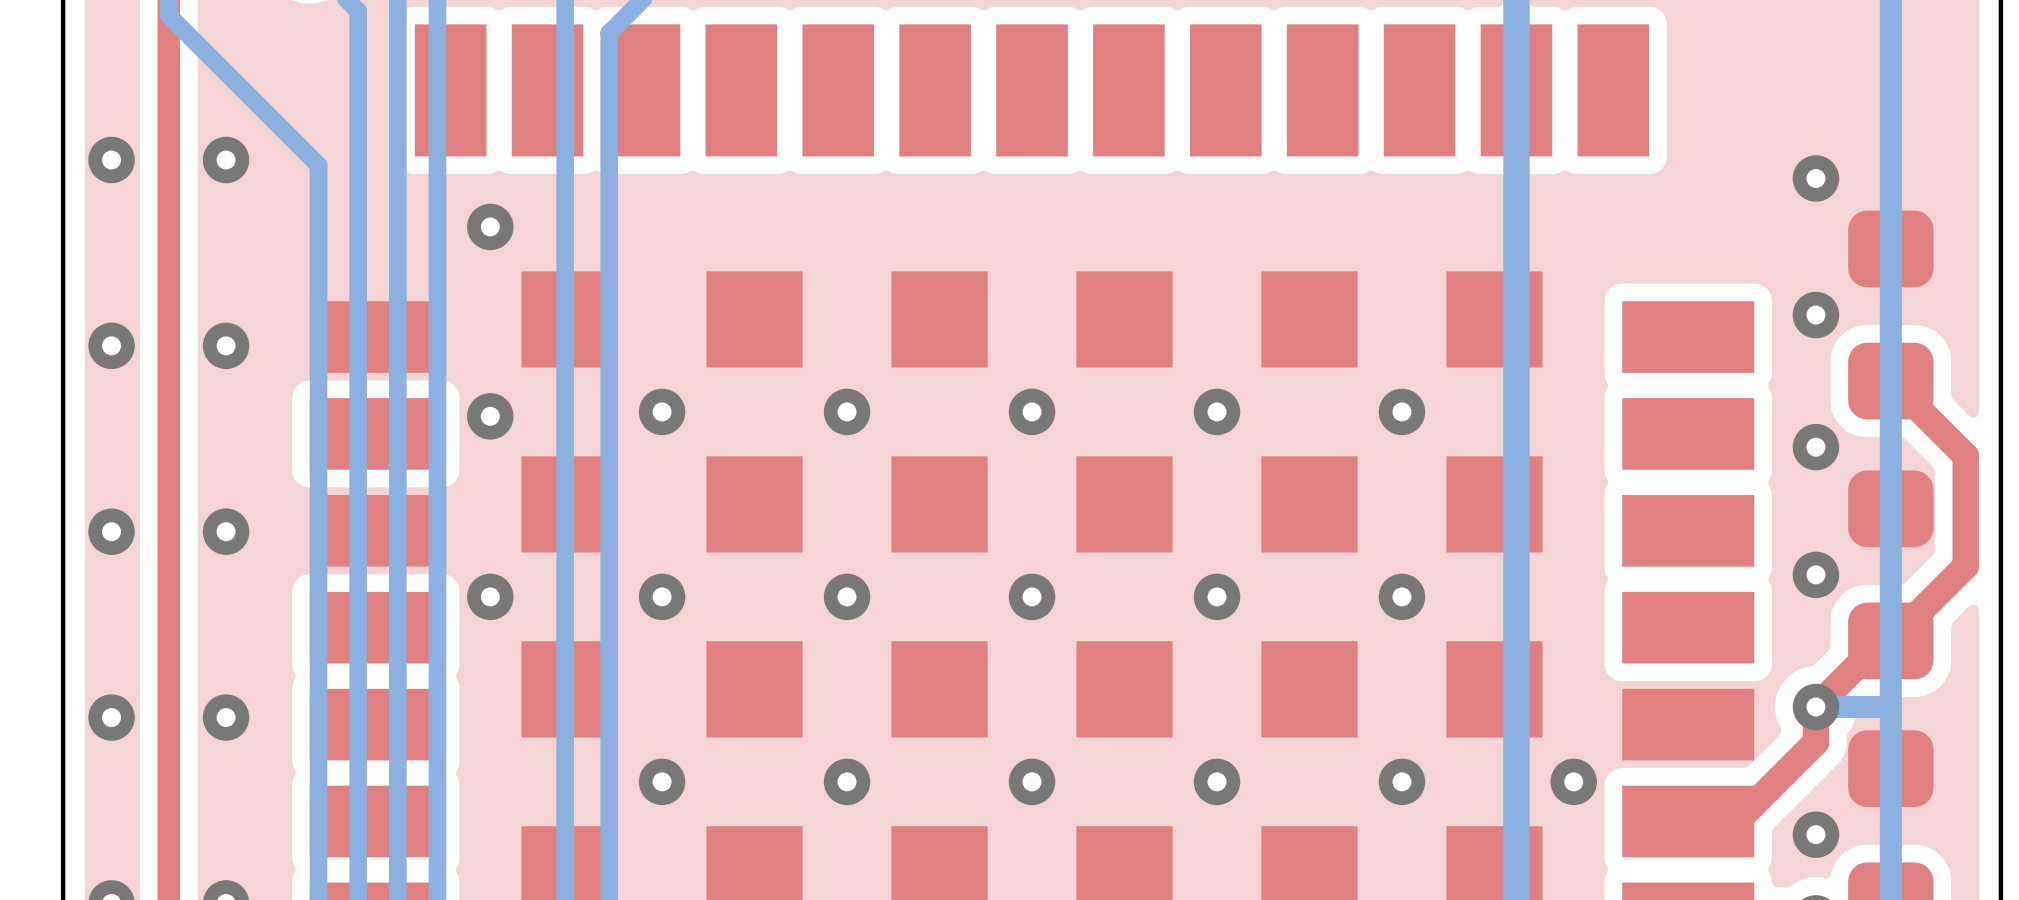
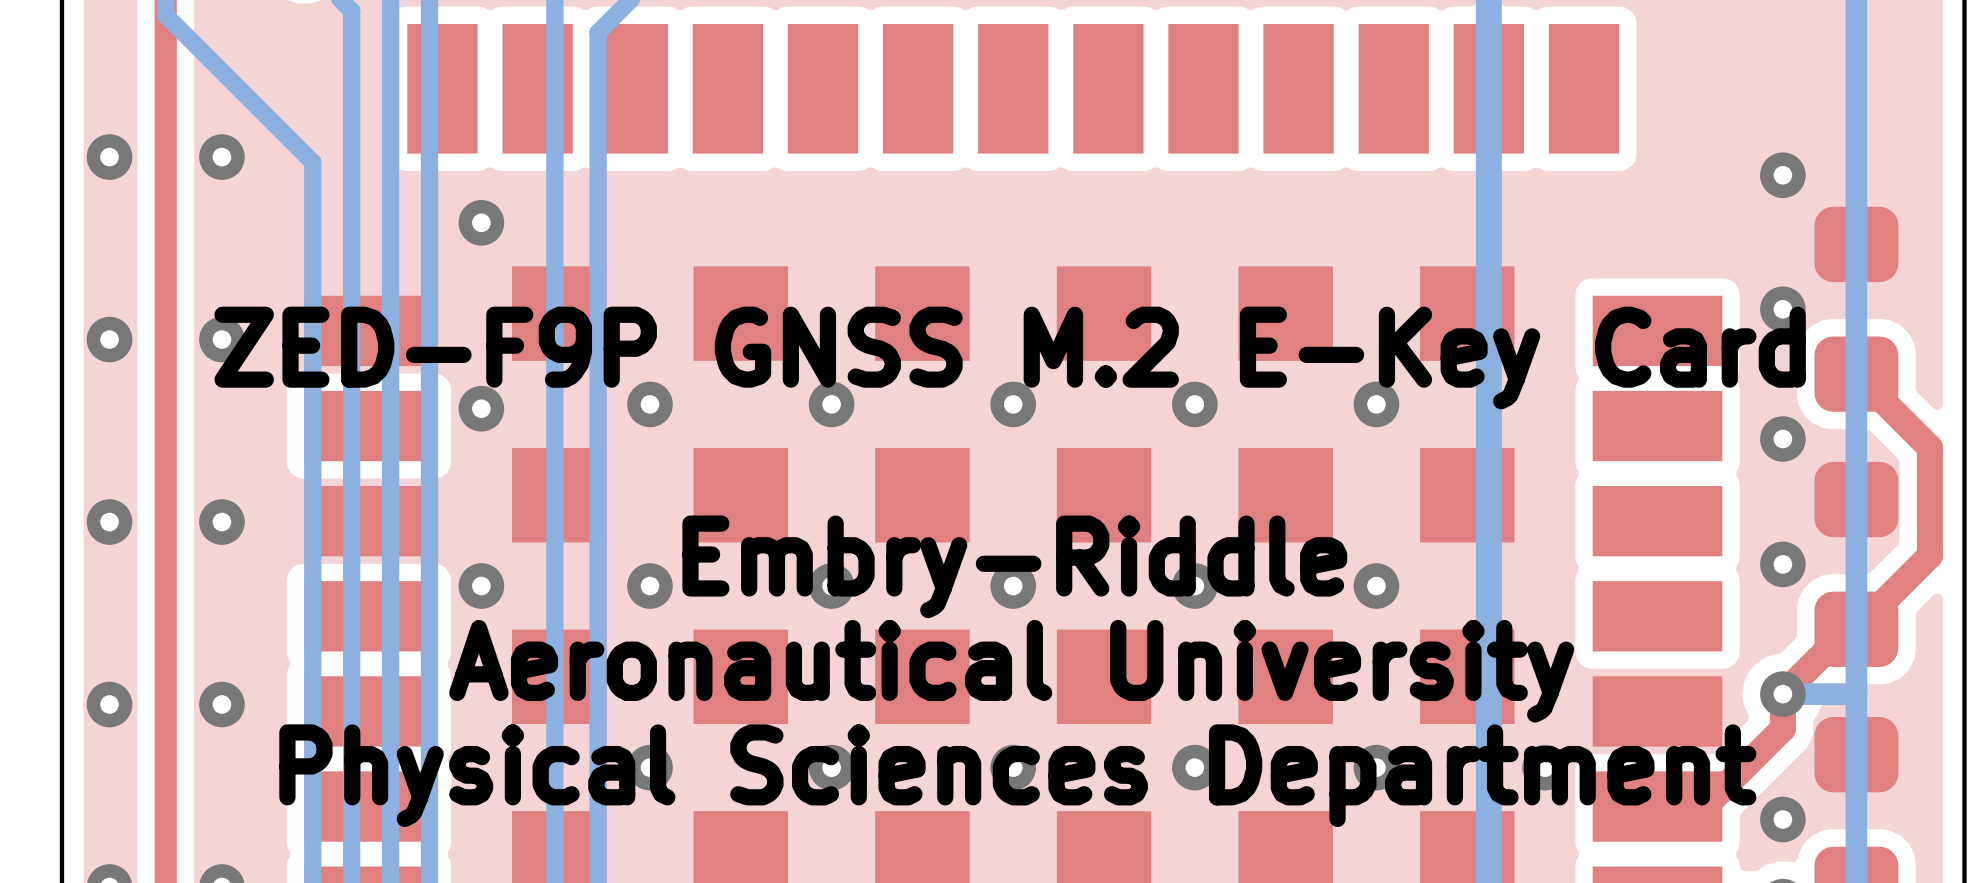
text: none -> ZED-F9P GNSS M.2 E-Key Card (1010, 358)
text: none -> Embry-Riddle (1014, 566)
text: none -> Aeronautical University (1011, 671)
text: none -> Physical Sciences Department (1017, 775)

